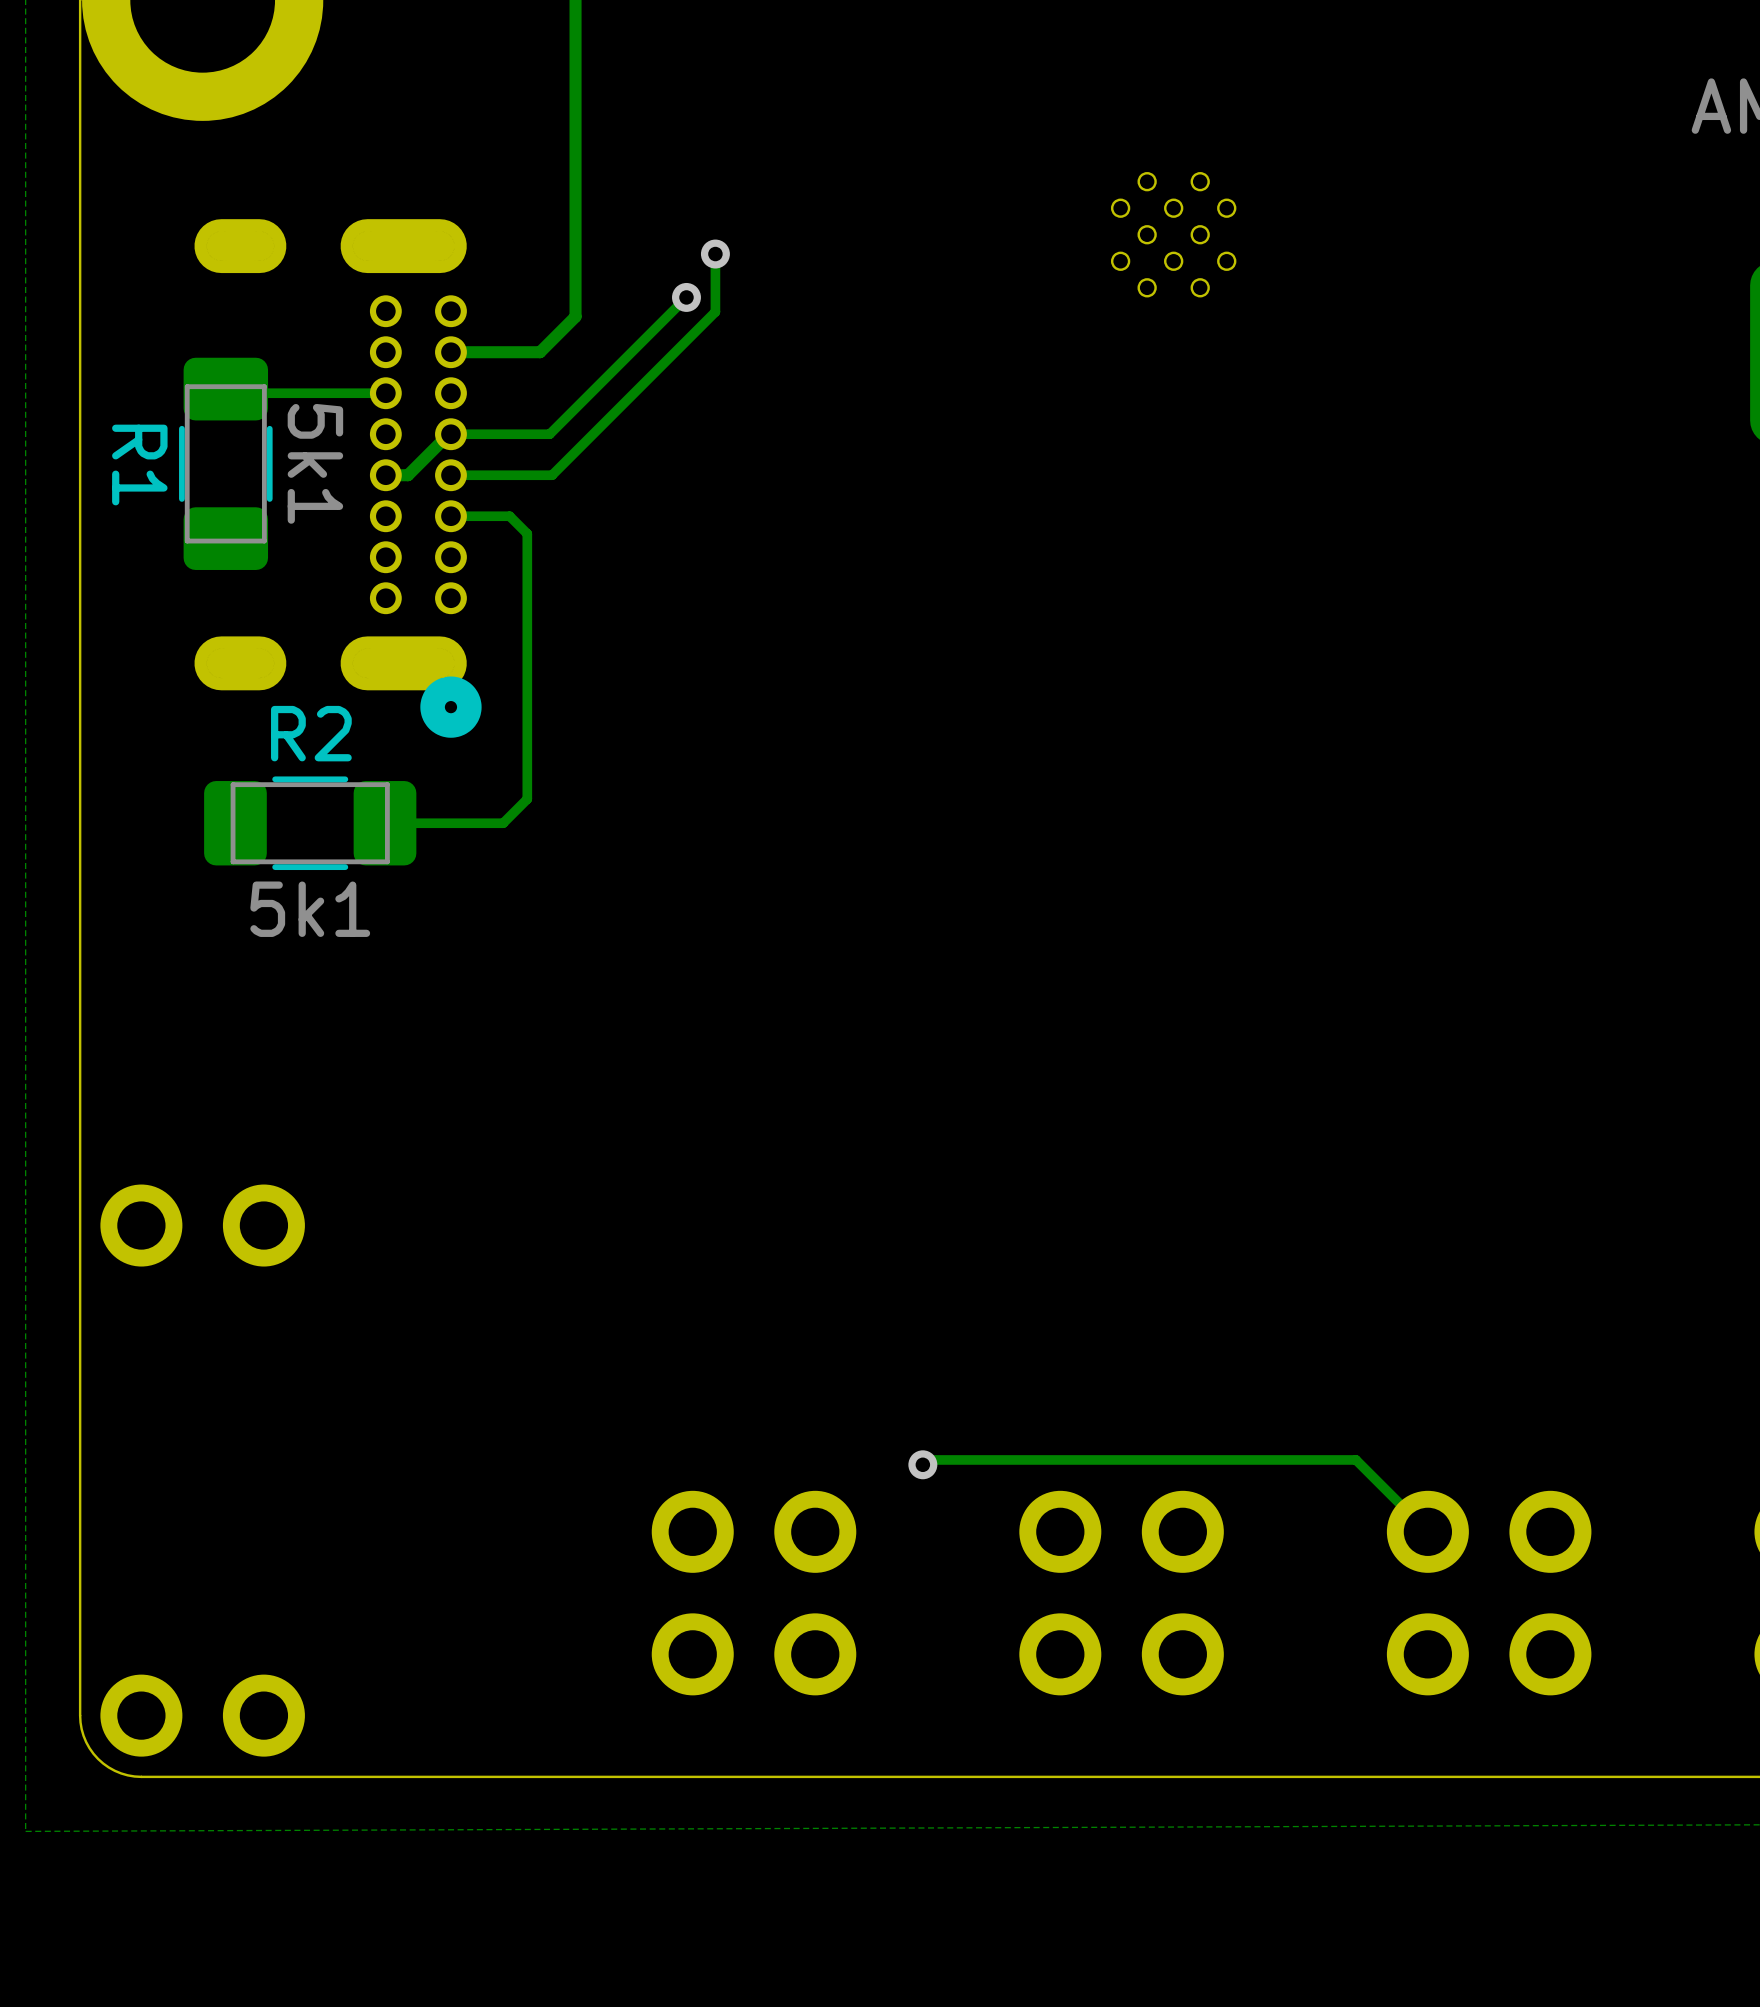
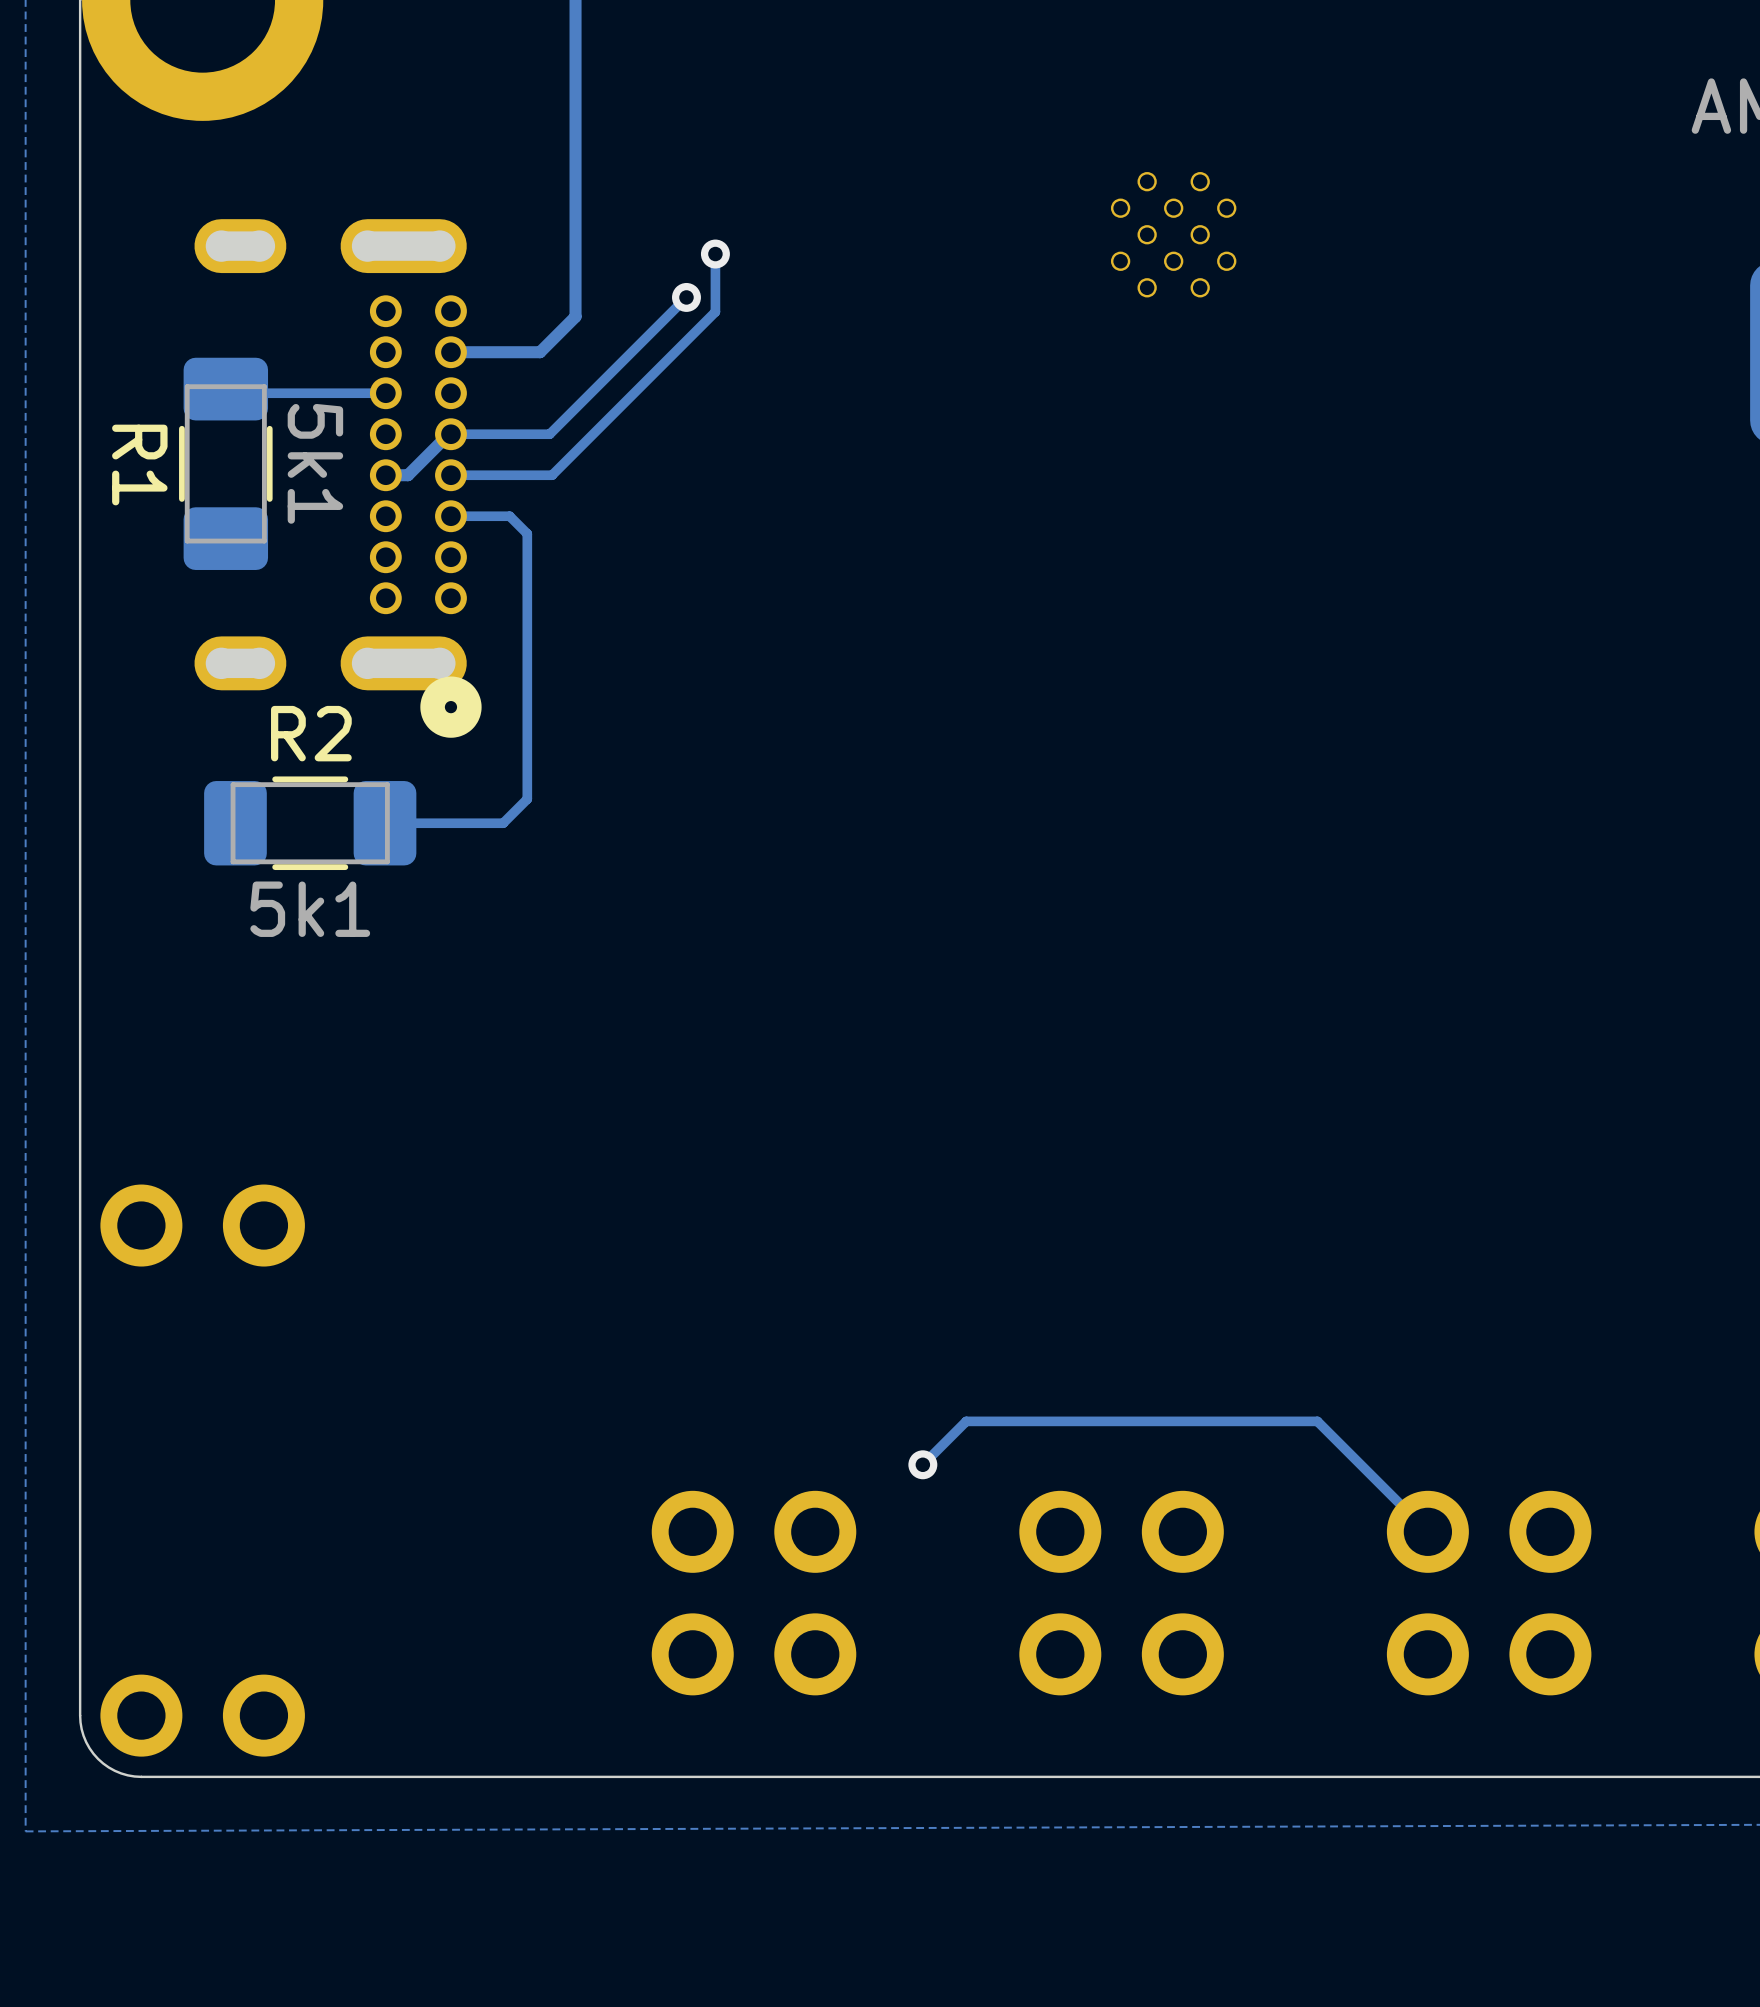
track: (1356, 1459) (927, 1459) -> (1356, 1459) (1317, 1421) (966, 1421) (927, 1459)

